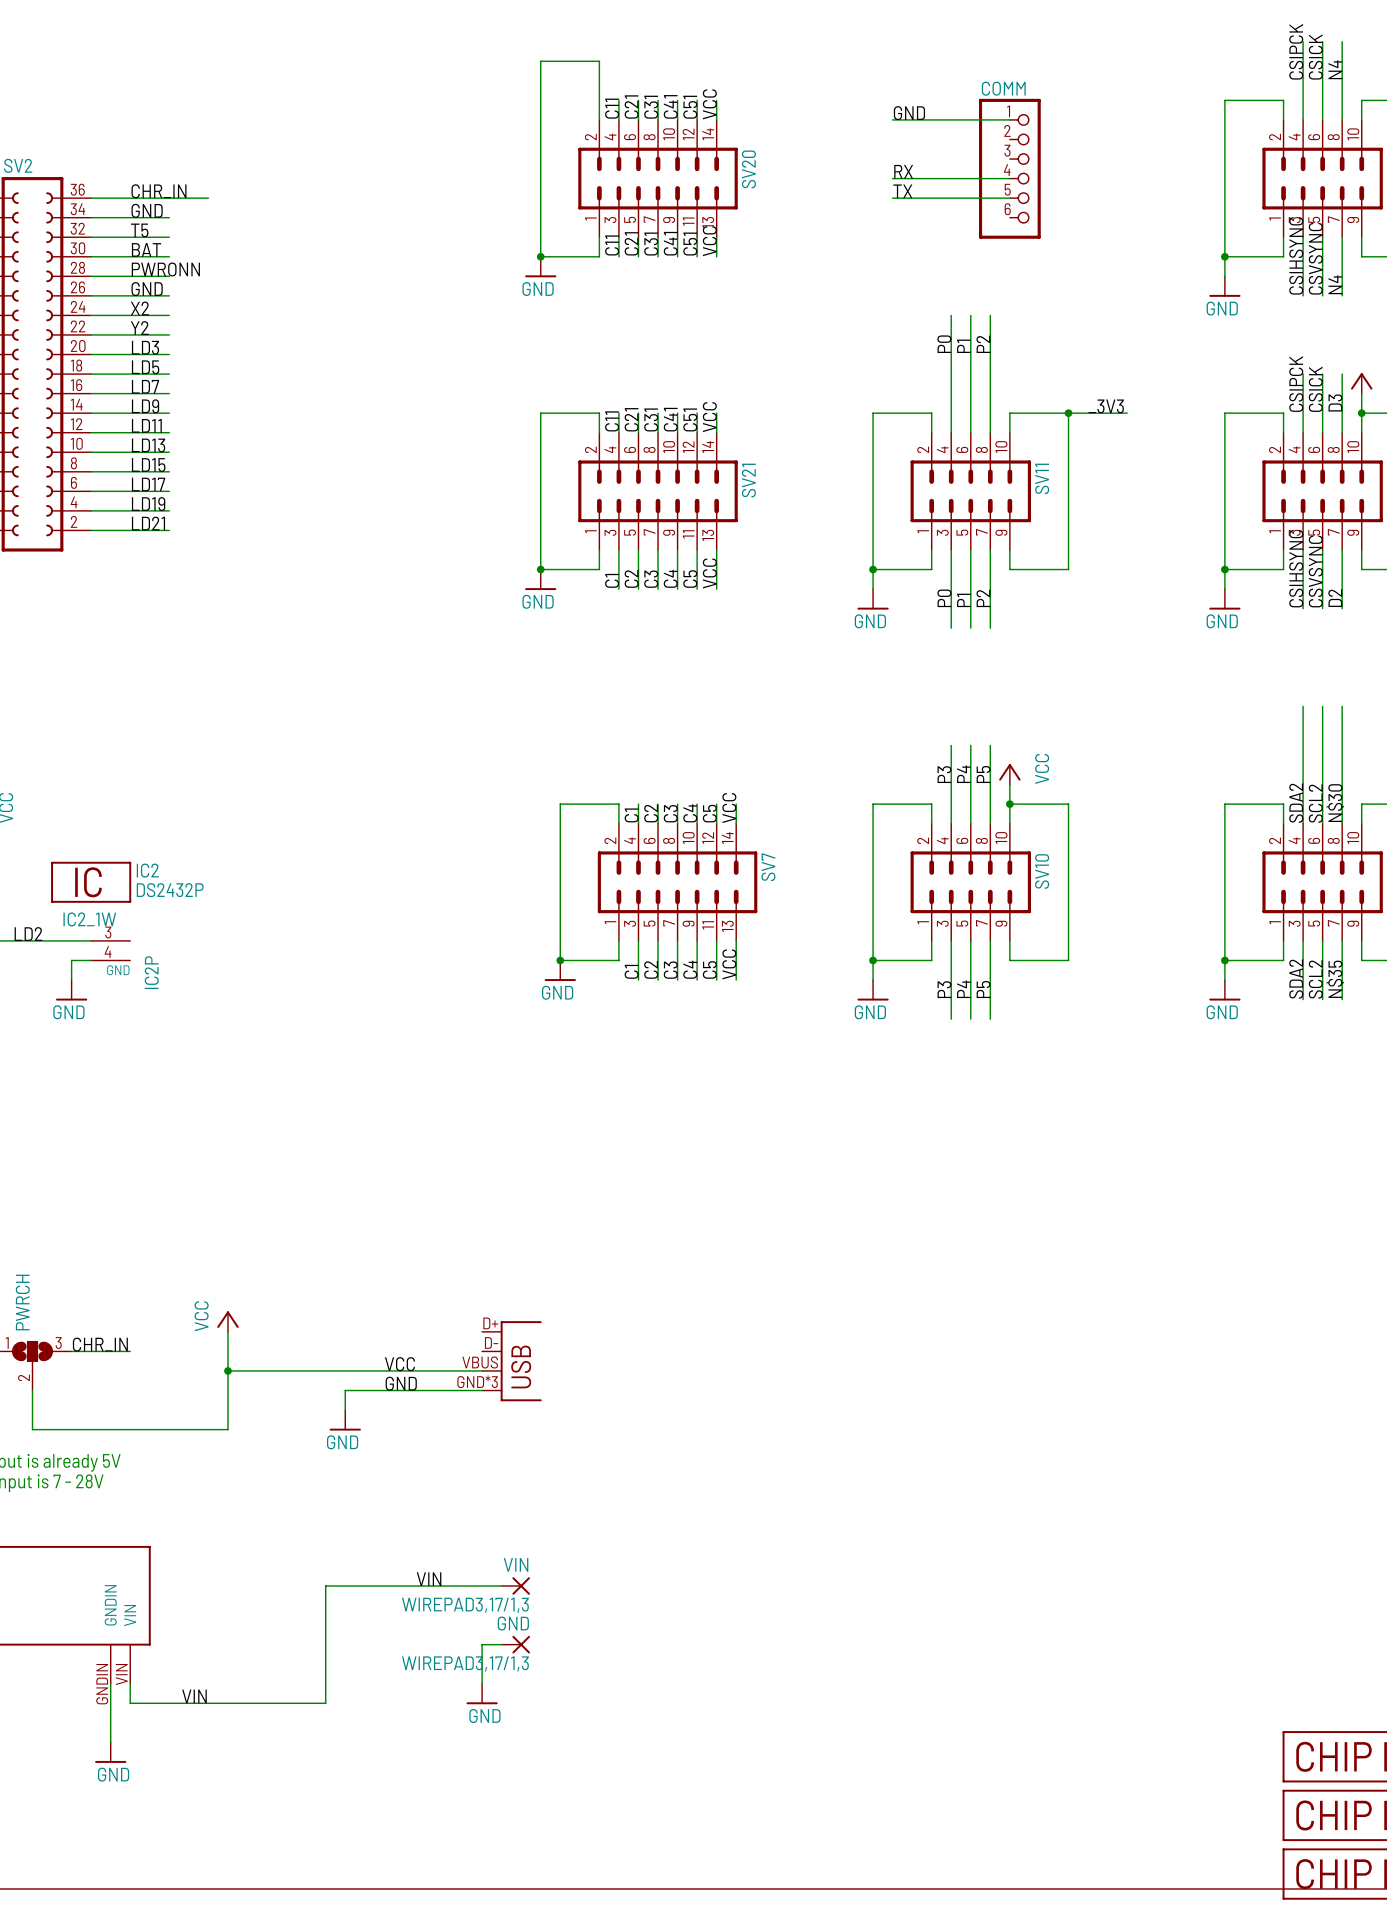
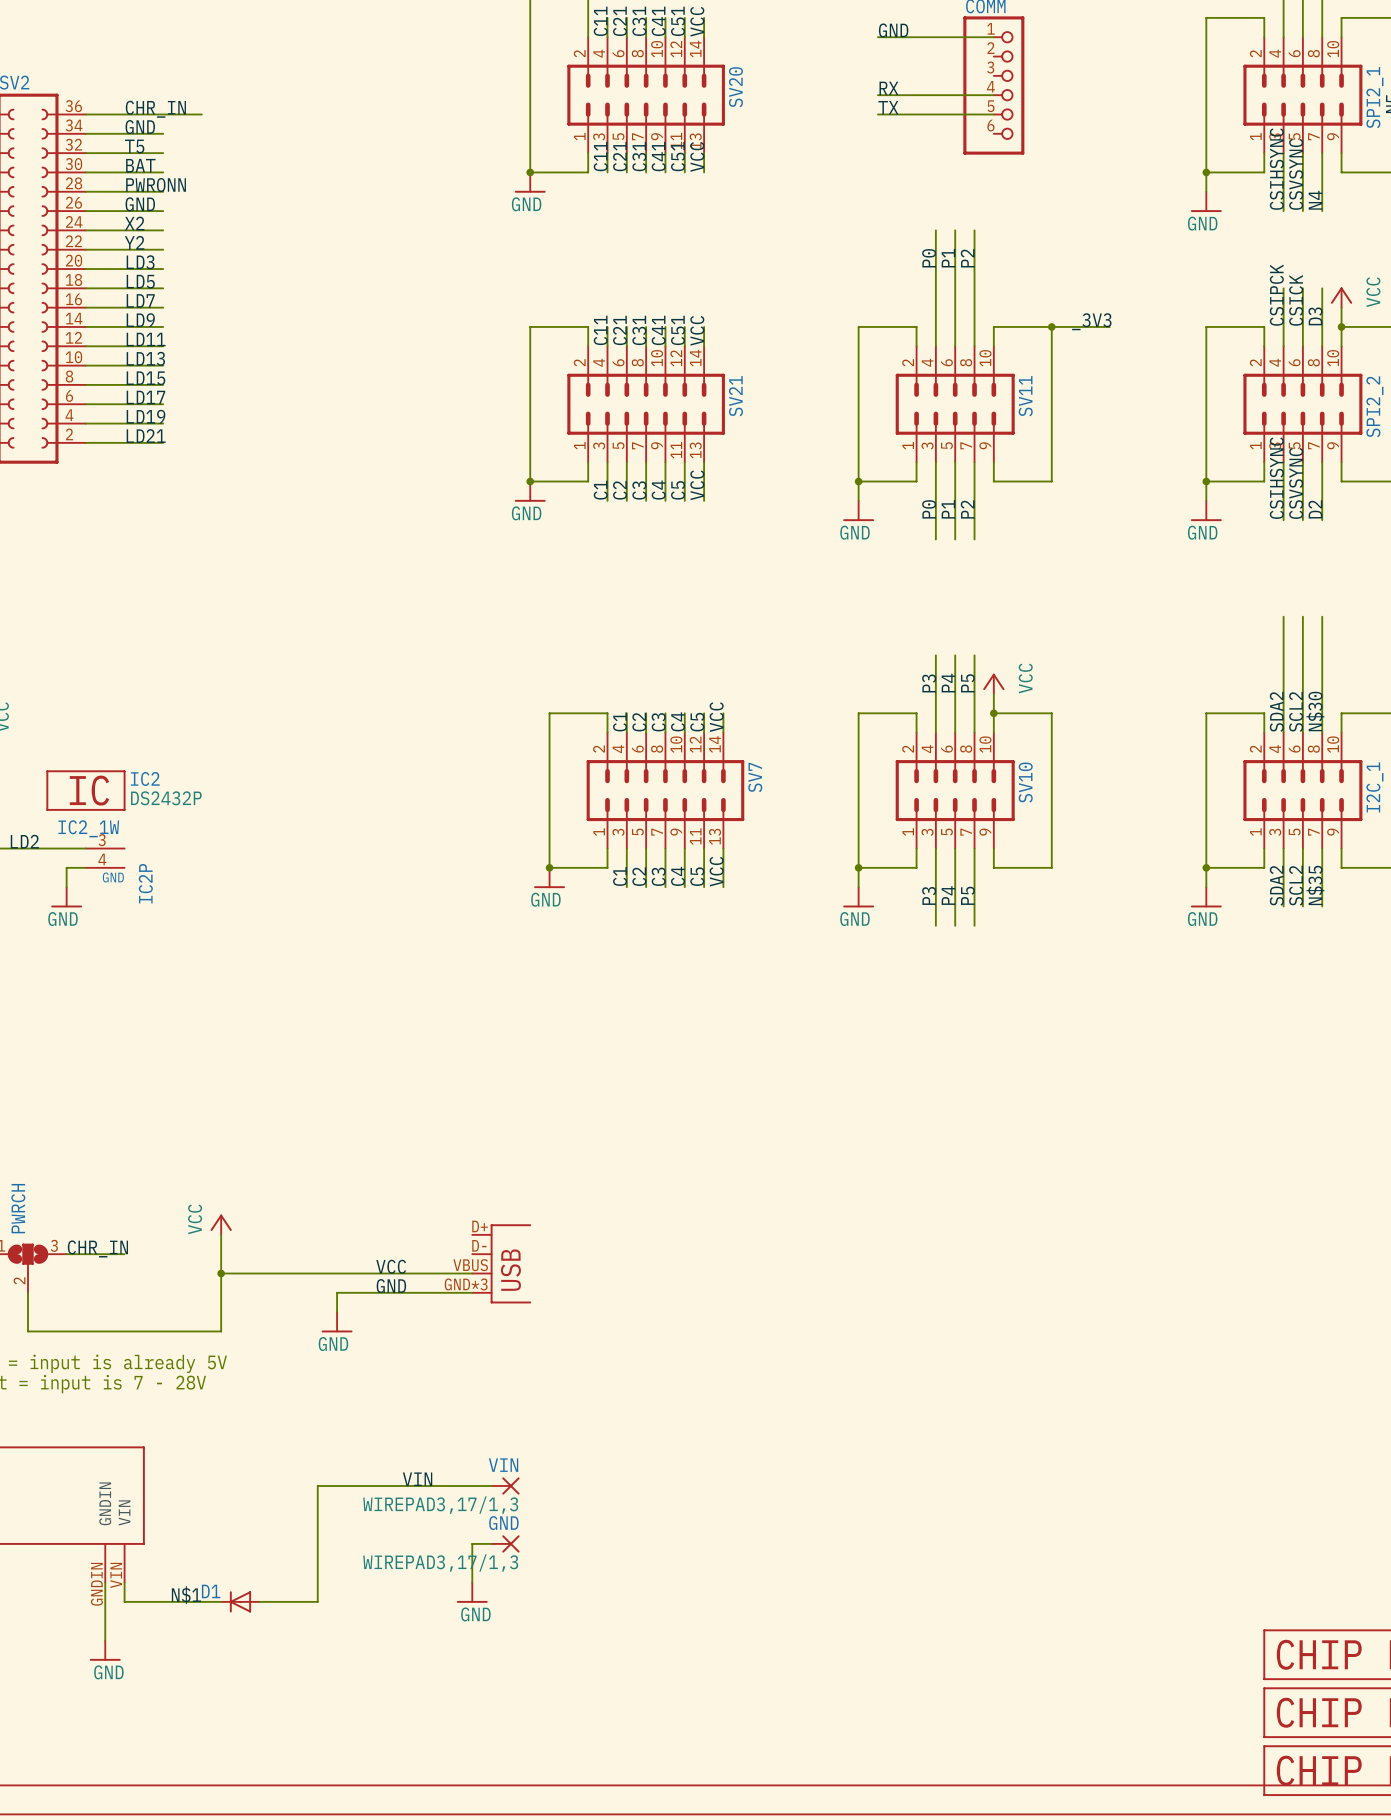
label: VIN (194, 1696) -> N$1 (186, 1595)
D1: none -> (240, 1601)

